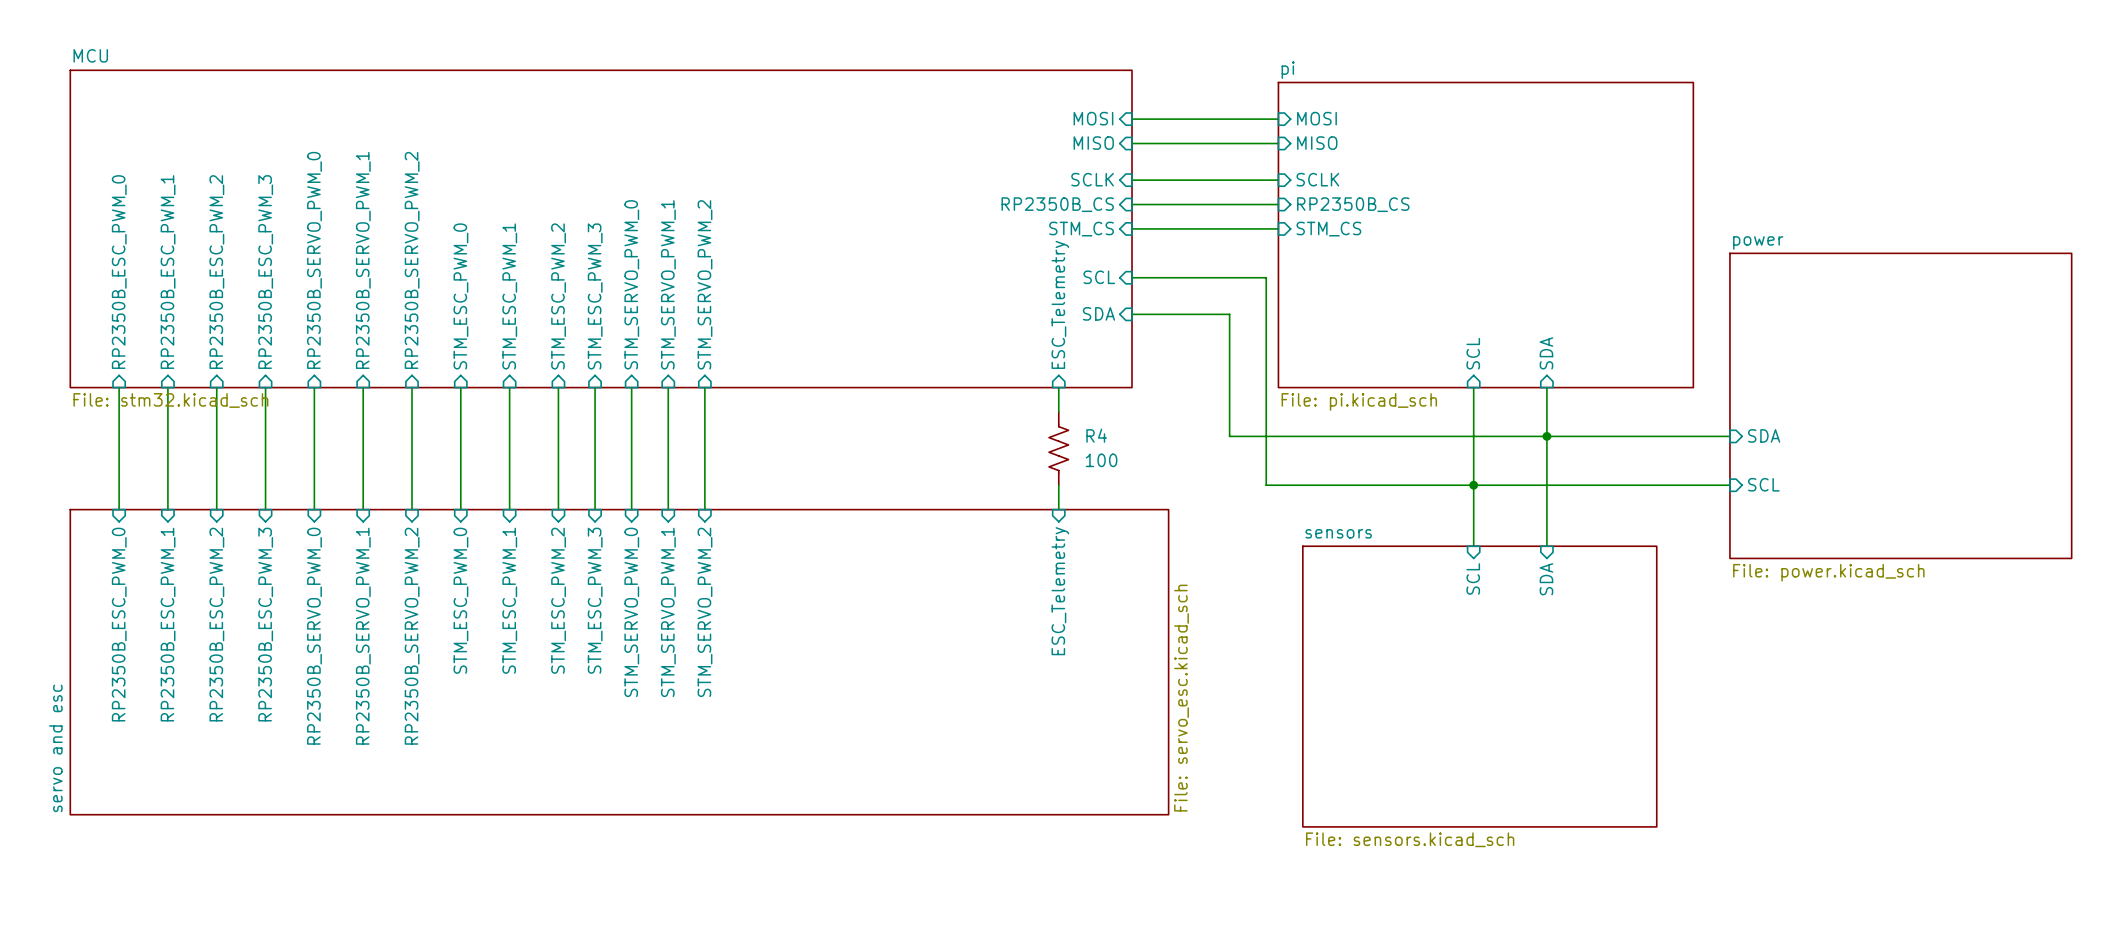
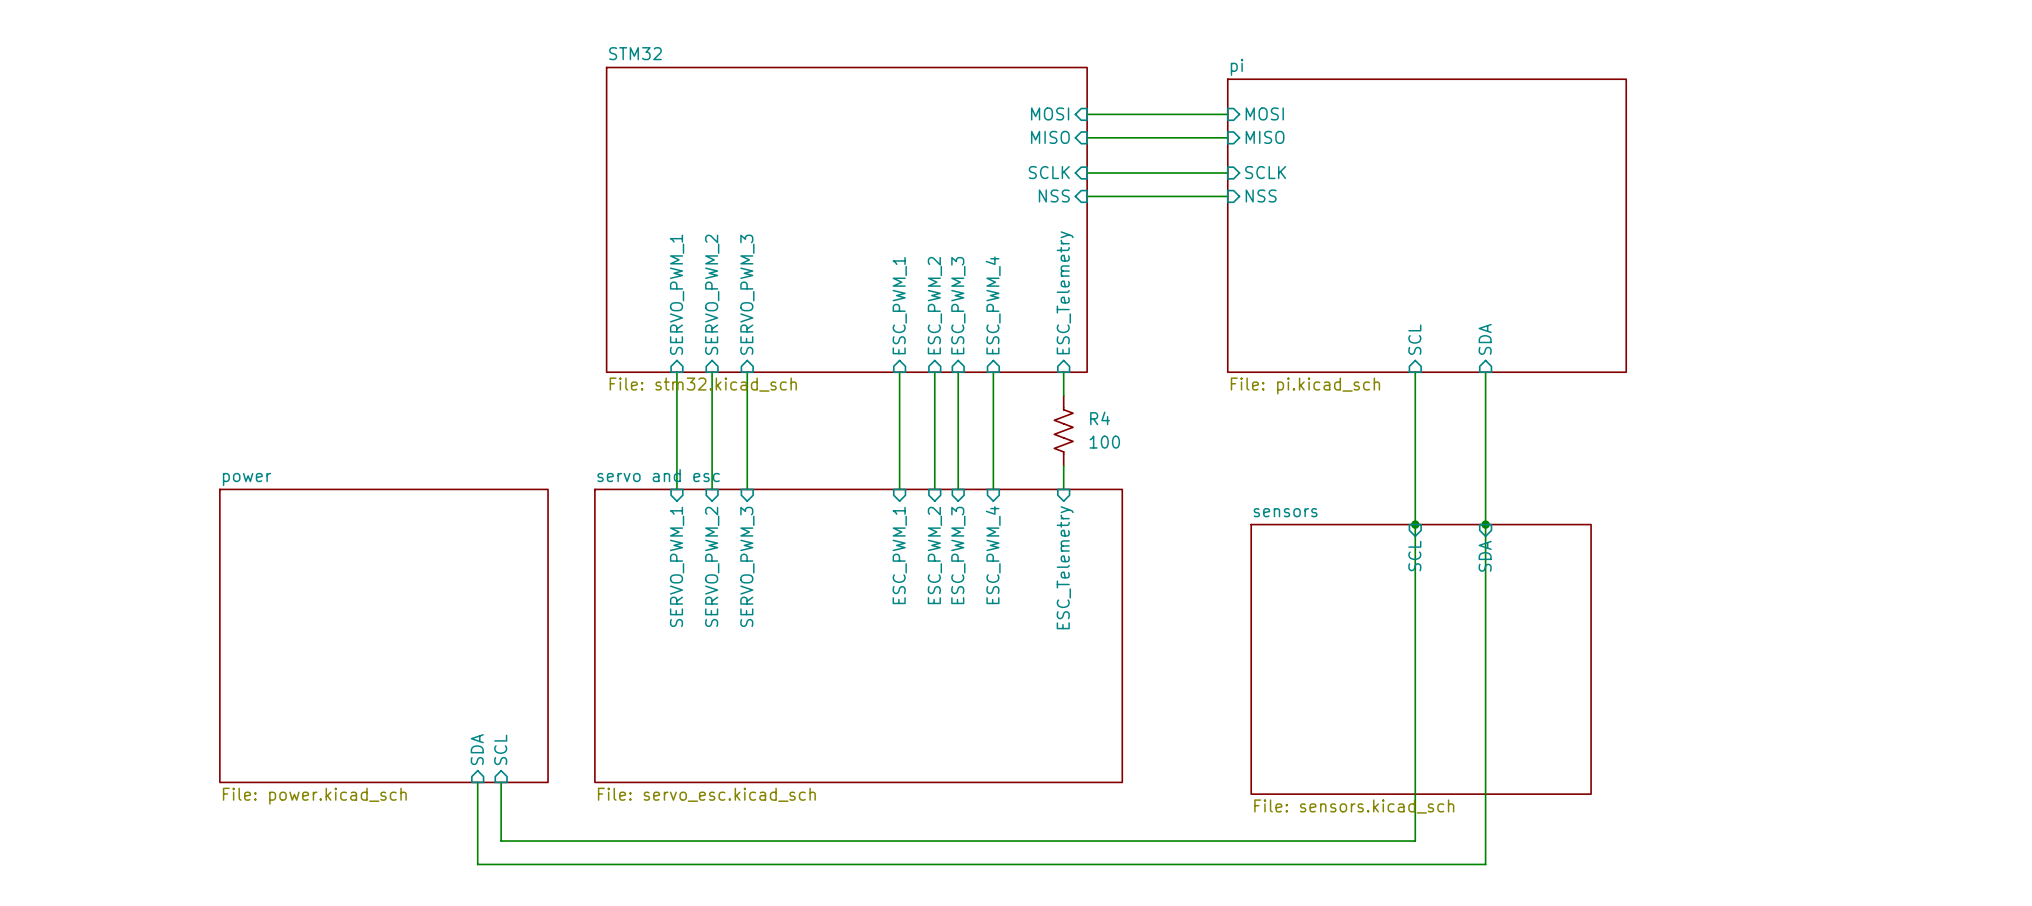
sheet pin: RP2350B_CS (1057, 204) -> NSS (1054, 195)
sheet pin: RP2350B_CS (1353, 204) -> NSS (1261, 195)
sheet MCU: File: stm32.kicad_sch (601, 228) -> none
sheet STM32: none -> File: stm32.kicad_sch (846, 219)
wire: (1132, 228) (1278, 228) -> none
sheet pin: STM_CS (1081, 229) -> none
sheet pin: STM_CS (1328, 229) -> none
sheet pin: RP2350B_SERVO_PWM_0 (314, 260) -> none
sheet pin: RP2350B_SERVO_PWM_1 (363, 260) -> none
sheet pin: RP2350B_SERVO_PWM_2 (412, 260) -> none
sheet pin: RP2350B_ESC_PWM_0 (119, 272) -> none
sheet pin: RP2350B_ESC_PWM_1 (168, 272) -> none
sheet pin: RP2350B_ESC_PWM_2 (216, 272) -> none
sheet pin: RP2350B_ESC_PWM_3 (265, 272) -> none
sheet pin: SCL (1099, 277) -> none
wire: (1132, 277) (1266, 277) (1266, 485) (1729, 485) -> none
sheet pin: STM_SERVO_PWM_0 (631, 284) -> none
sheet pin: STM_SERVO_PWM_1 (668, 284) -> none
sheet pin: STM_SERVO_PWM_2 (705, 284) -> SERVO_PWM_1 (677, 294)
sheet pin: STM_ESC_PWM_0 (460, 296) -> none
sheet pin: STM_ESC_PWM_1 (509, 296) -> none
sheet pin: STM_ESC_PWM_2 (558, 296) -> none
sheet pin: STM_ESC_PWM_3 (595, 296) -> none
sheet pin position: ESC_Telemetry (1060, 304) -> ESC_Telemetry (1065, 292)
sheet pin: none -> SERVO_PWM_2 (712, 294)
sheet pin: none -> SERVO_PWM_3 (747, 294)
sheet pin: SDA (1098, 313) -> none
wire: (1132, 314) (1229, 314) (1229, 436) (1729, 436) -> none
sheet pin: none -> ESC_PWM_4 (993, 305)
sheet pin: none -> ESC_PWM_1 (899, 305)
sheet pin: none -> ESC_PWM_2 (934, 305)
sheet pin: none -> ESC_PWM_3 (958, 305)
wire: (119, 387) (119, 509) -> none
wire: (167, 387) (167, 509) -> none
wire: (216, 387) (216, 509) -> none
wire: (265, 387) (265, 509) -> none
wire: (314, 387) (314, 509) -> none
wire: (363, 387) (363, 509) -> none
wire: (411, 387) (411, 509) -> none
wire: (460, 387) (460, 509) -> none
wire: (509, 387) (509, 509) -> none
wire: (558, 387) (558, 509) -> none
wire: (595, 387) (595, 509) -> none
wire: (631, 387) (631, 509) -> (712, 372) (712, 489)
wire: (668, 387) (668, 509) -> (747, 372) (747, 489)
wire: none -> (899, 372) (899, 489)
wire: none -> (934, 372) (934, 489)
wire: none -> (958, 372) (958, 489)
wire: none -> (993, 372) (993, 489)
wire: (1058, 387) (1058, 411) -> (1063, 372) (1063, 395)
sheet power: File: power.kicad_sch (1900, 405) -> none
sheet pin: SDA (1764, 435) -> none
junction: (1546, 436) -> none
R4 position: (1058, 448) -> (1063, 430)
sheet pin: SCL (1763, 484) -> none
wire: (1058, 485) (1058, 509) -> (1063, 465) (1063, 489)
junction: (1473, 485) -> none
wire: none -> (1415, 524) (1415, 841) (501, 841) (501, 782)
junction: none -> (1415, 524)
wire: none -> (1485, 524) (1485, 864) (477, 864) (477, 782)
junction: none -> (1485, 524)
sheet pin: none -> ESC_PWM_1 (899, 555)
sheet pin: none -> ESC_PWM_2 (934, 555)
sheet pin: none -> ESC_PWM_3 (958, 555)
sheet pin: none -> ESC_PWM_4 (993, 555)
sheet pin: none -> SERVO_PWM_2 (712, 566)
sheet pin: none -> SERVO_PWM_3 (747, 566)
sheet pin position: ESC_Telemetry (1060, 591) -> ESC_Telemetry (1065, 567)
sheet pin: STM_ESC_PWM_0 (460, 600) -> none
sheet pin: STM_ESC_PWM_1 (509, 600) -> none
sheet pin: STM_ESC_PWM_2 (558, 600) -> none
sheet pin: STM_ESC_PWM_3 (595, 600) -> none
sheet pin: STM_SERVO_PWM_0 (631, 612) -> none
sheet pin: STM_SERVO_PWM_1 (668, 612) -> none
sheet pin: STM_SERVO_PWM_2 (705, 612) -> SERVO_PWM_1 (677, 566)
sheet pin: RP2350B_ESC_PWM_0 (119, 624) -> none
sheet pin: RP2350B_ESC_PWM_1 (168, 624) -> none
sheet pin: RP2350B_ESC_PWM_2 (216, 624) -> none
sheet pin: RP2350B_ESC_PWM_3 (265, 624) -> none
sheet pin: RP2350B_SERVO_PWM_0 (314, 636) -> none
sheet pin: RP2350B_SERVO_PWM_1 (363, 636) -> none
sheet pin: RP2350B_SERVO_PWM_2 (412, 636) -> none
sheet power: none -> File: power.kicad_sch (383, 635)
sheet servo and esc: File: servo_esc.kicad_sch (619, 662) -> none
sheet servo and esc: none -> File: servo_esc.kicad_sch (858, 635)
sheet pin: none -> SDA (477, 749)
sheet pin: none -> SCL (500, 749)

